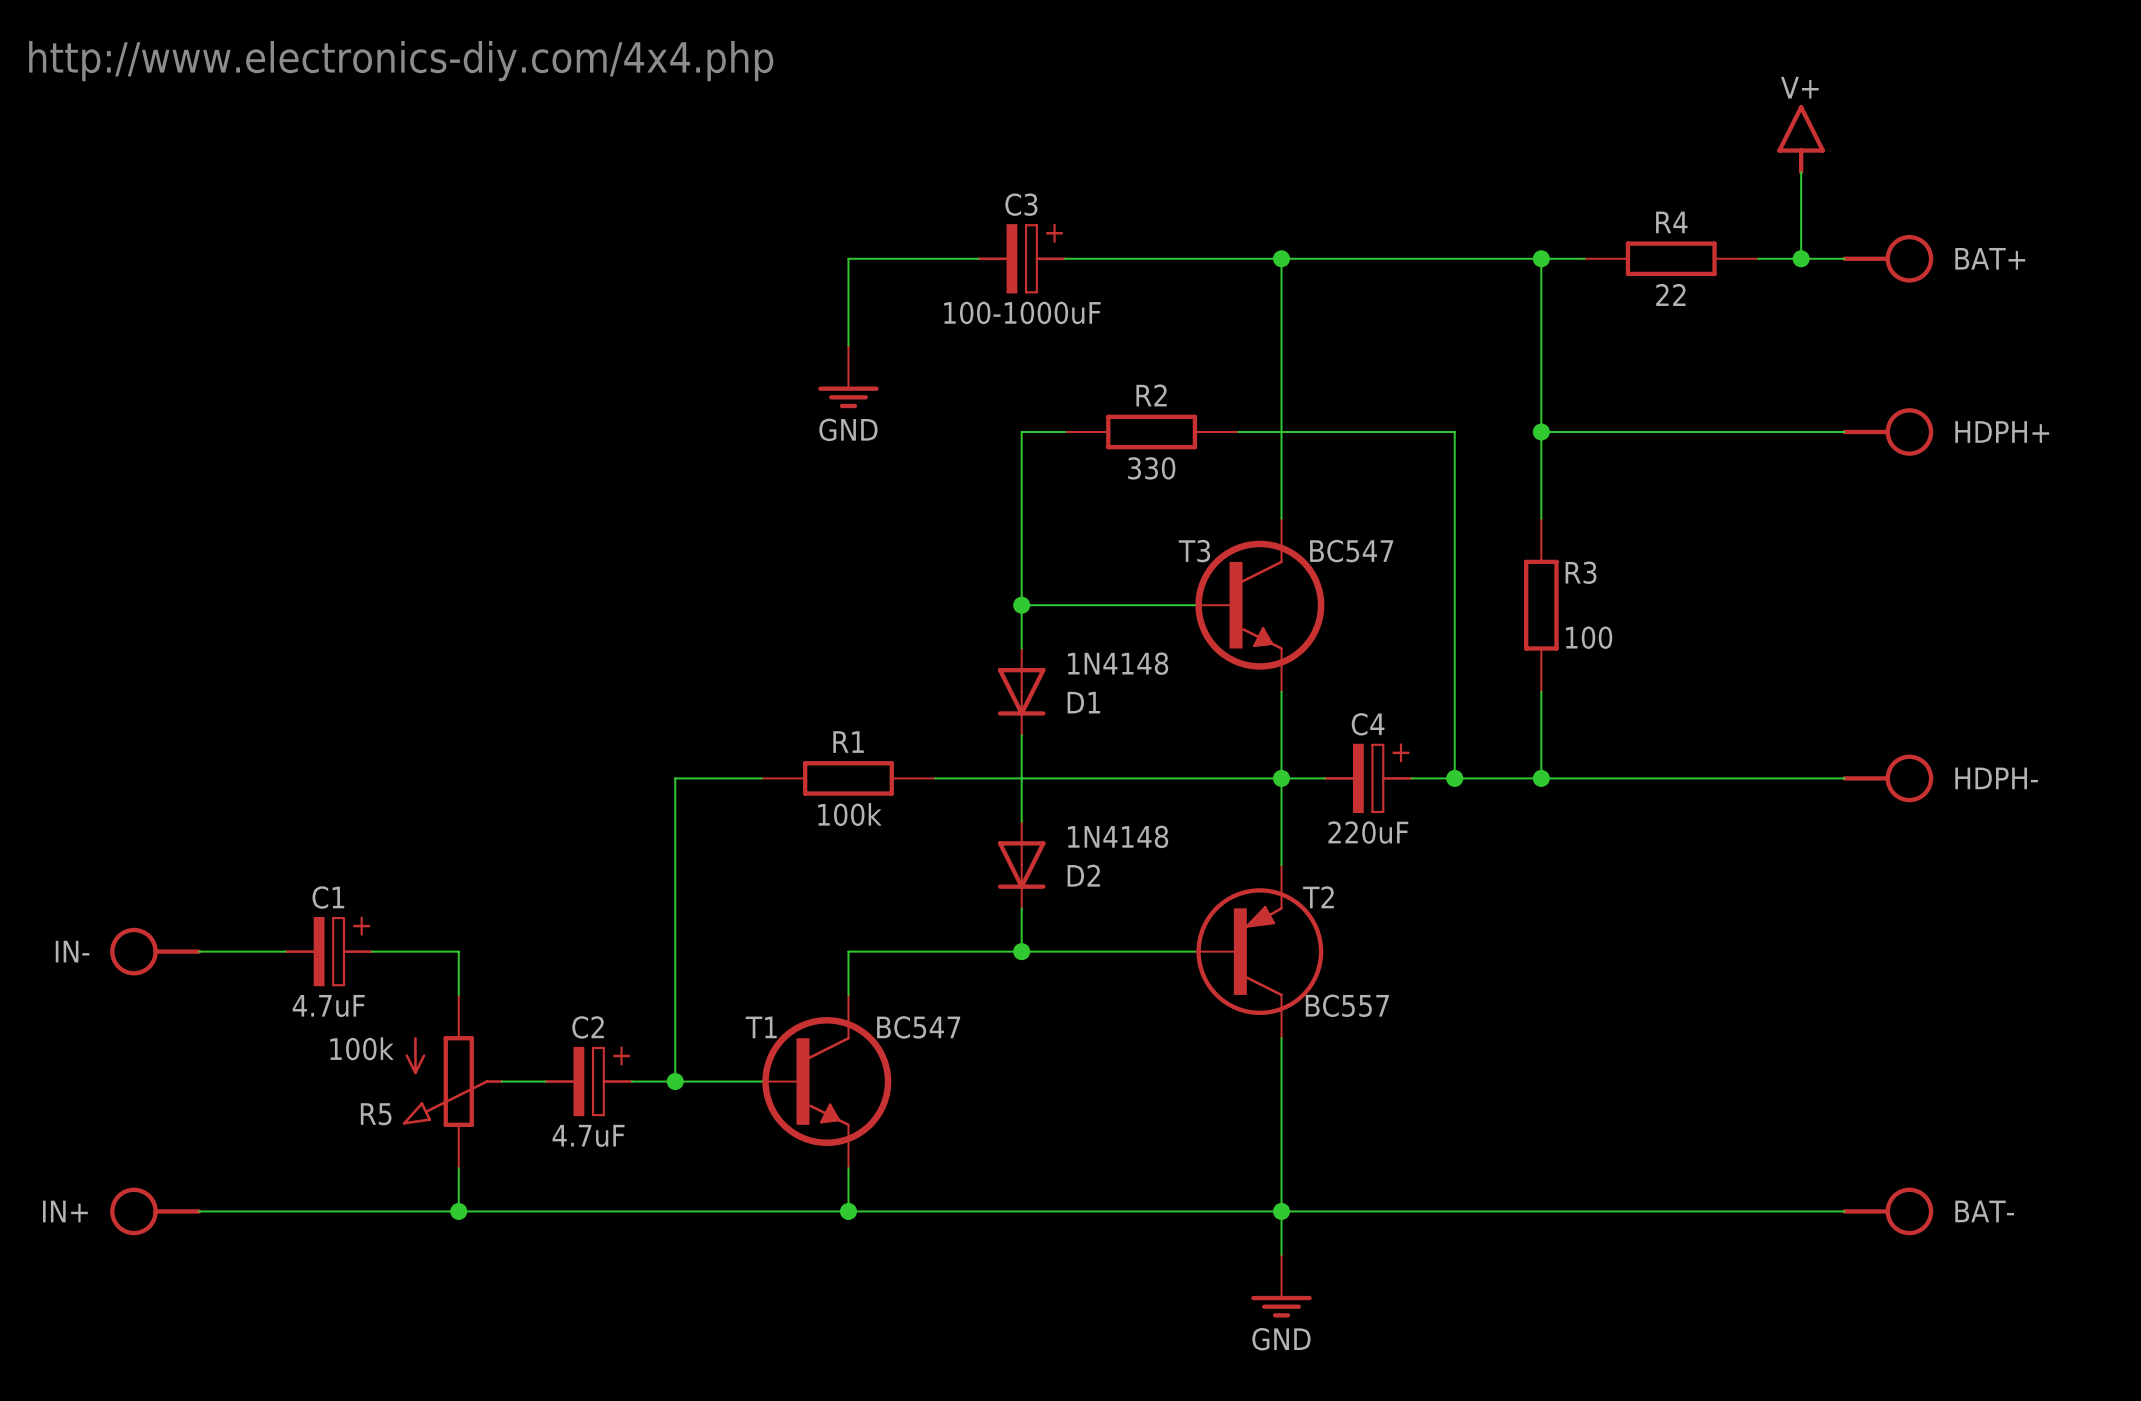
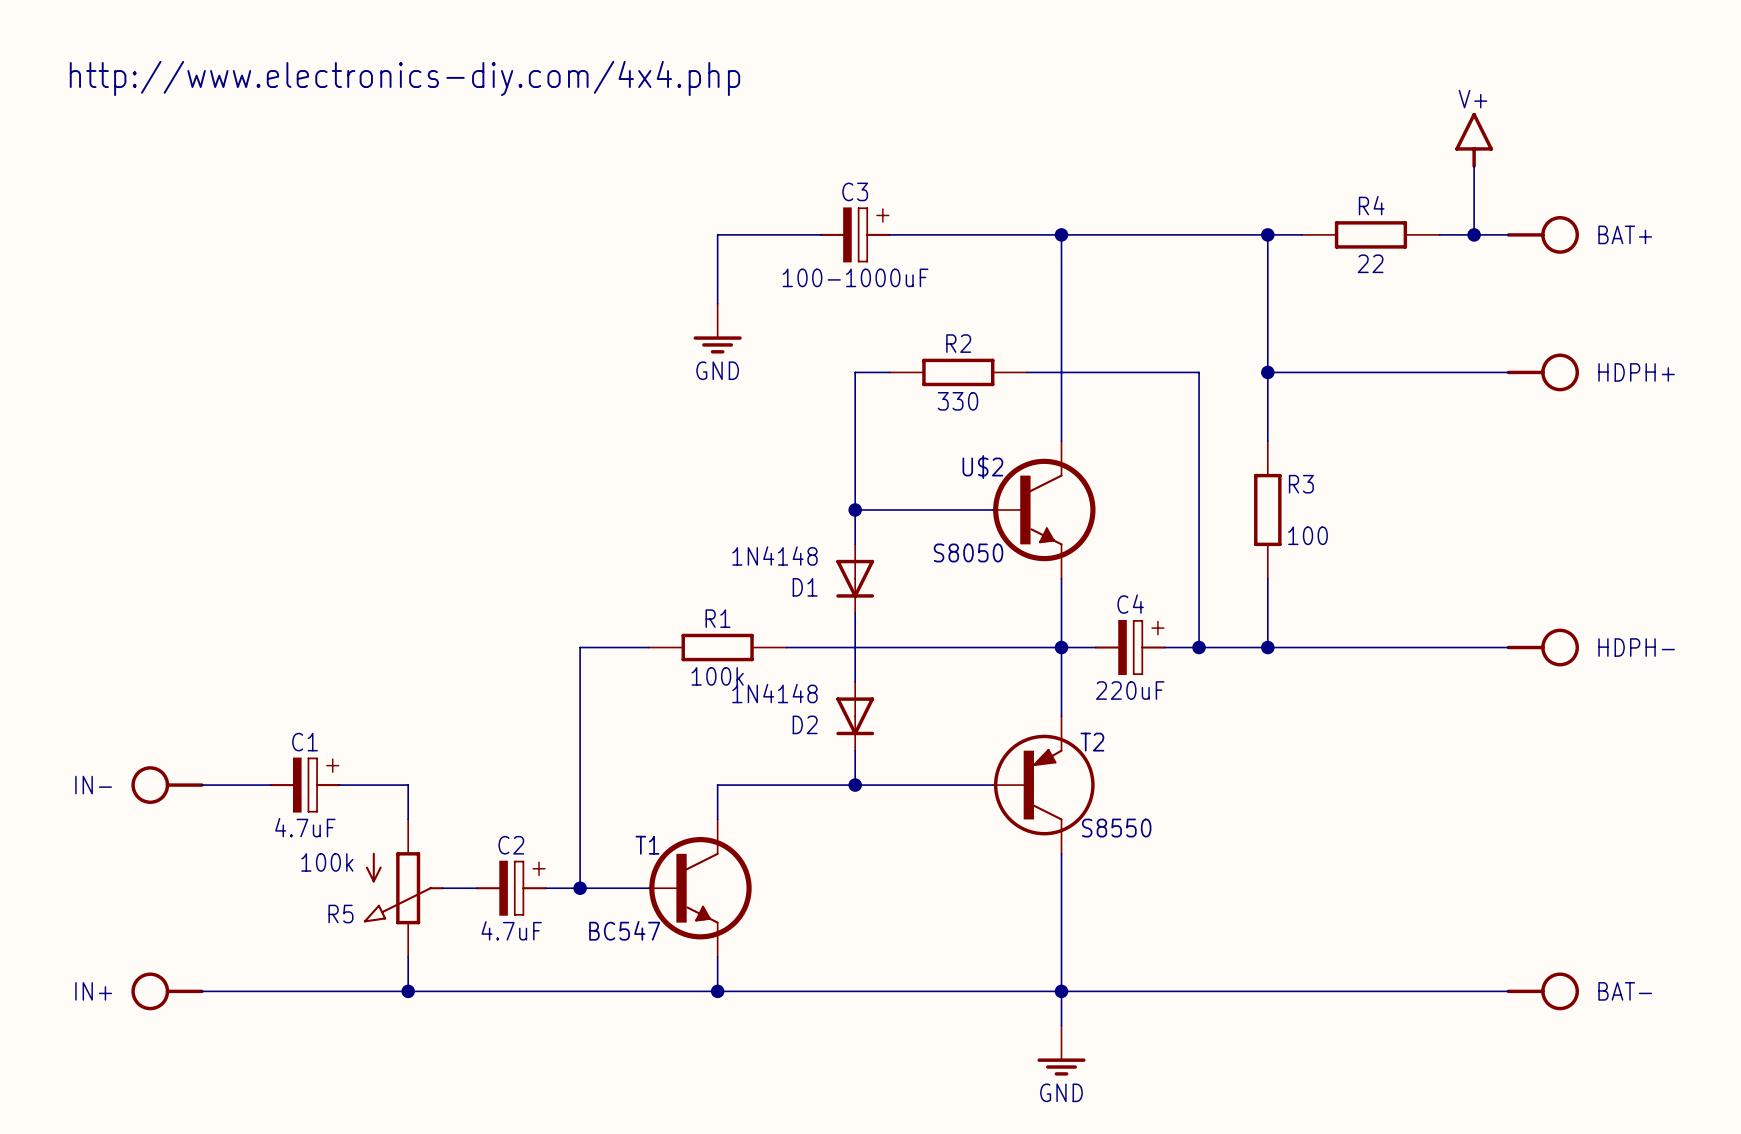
T3 name: T3 (1194, 551) -> U$2 (982, 467)
T3 value: BC547 (1351, 551) -> S8050 (968, 552)
D1 value position: 1N4148 (1118, 663) -> 1N4148 (774, 556)
D1 name position: D1 (1083, 702) -> D1 (805, 587)
D2 value position: 1N4148 (1118, 836) -> 1N4148 (774, 693)
D2 name position: D2 (1083, 875) -> D2 (805, 724)
T2 value: BC557 (1347, 1005) -> S8550 (1116, 828)
T1 value position: BC547 (918, 1027) -> BC547 (624, 930)

